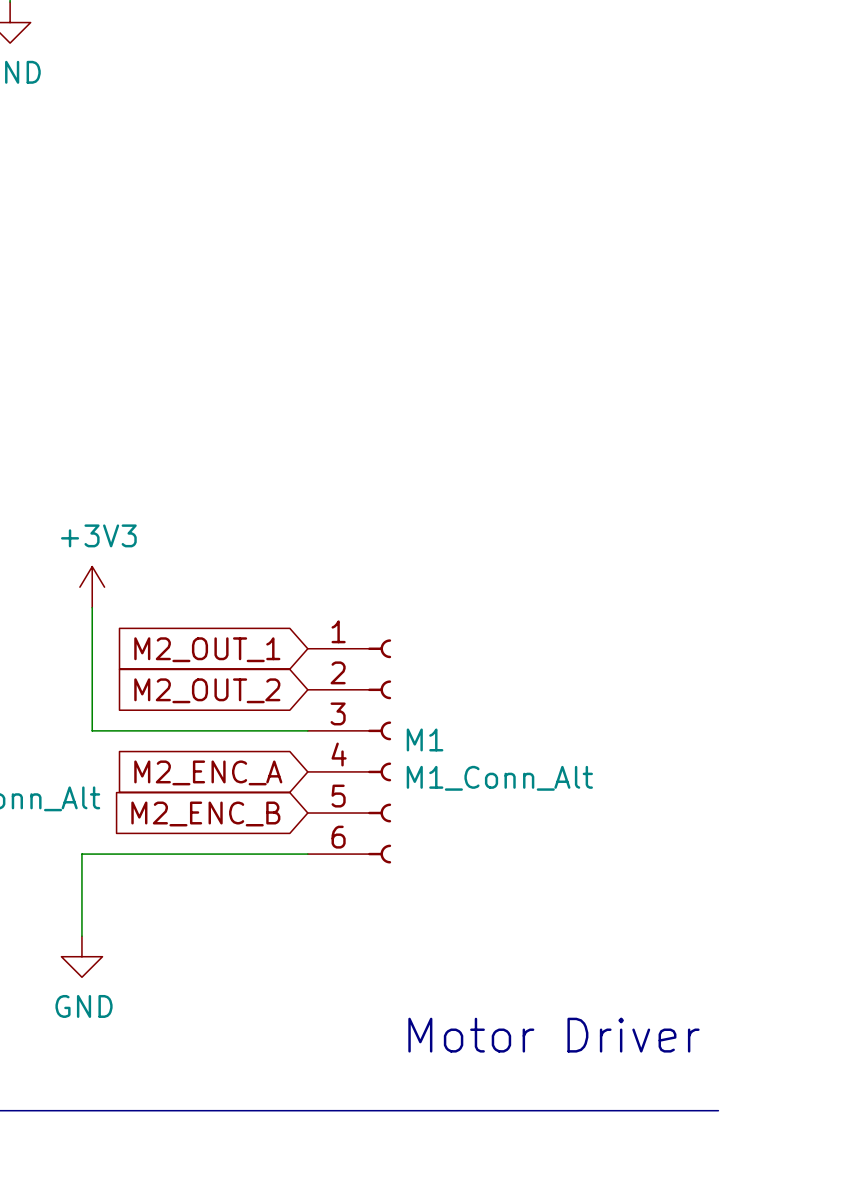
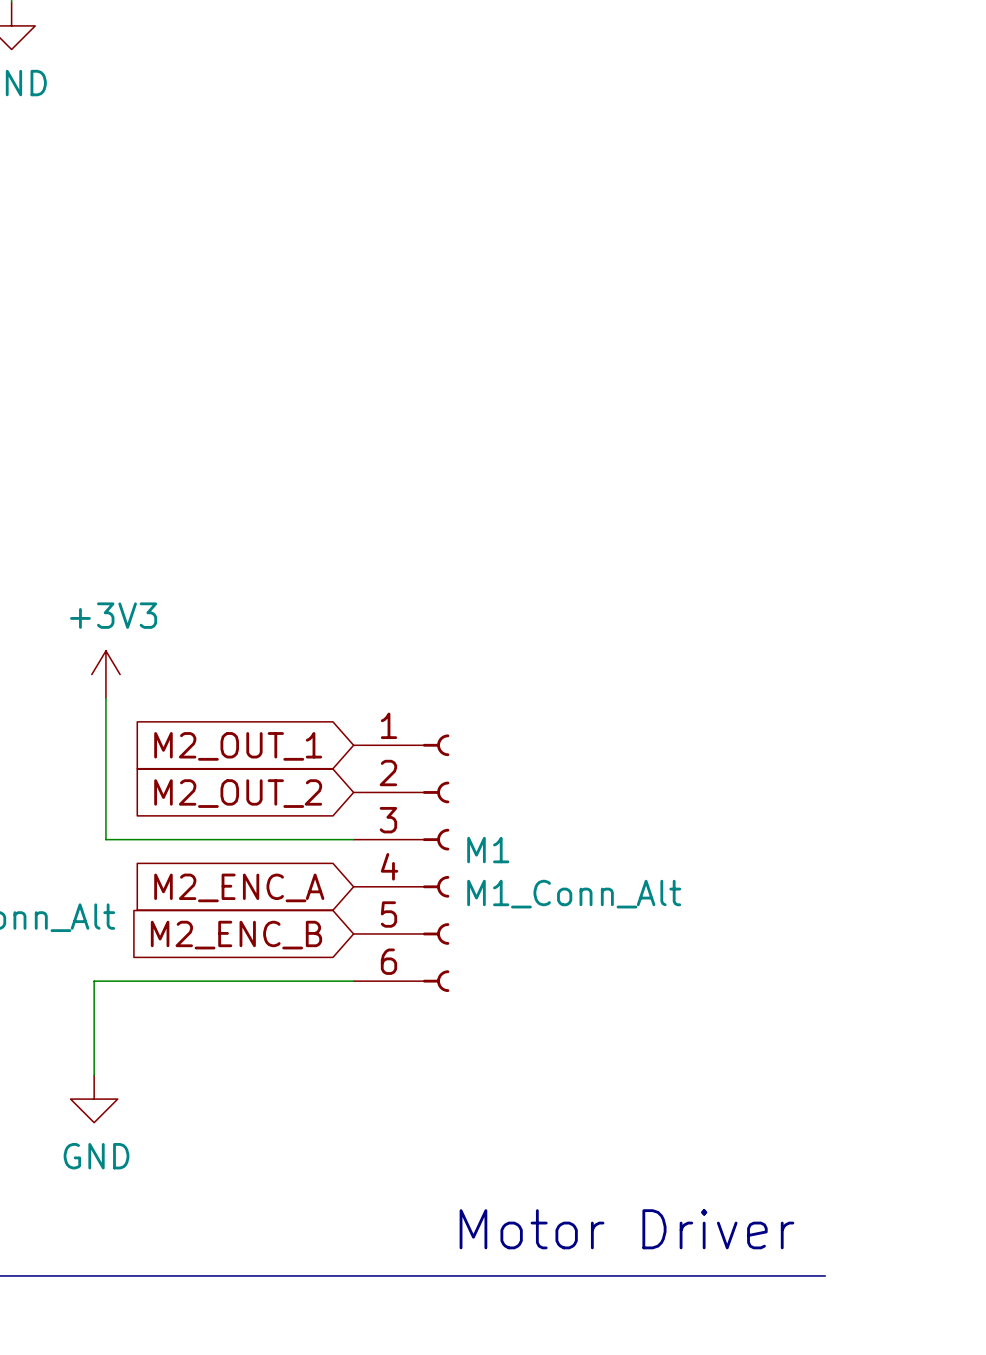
text position: Motor Driver (553, 1035) -> Motor Driver (626, 1229)

